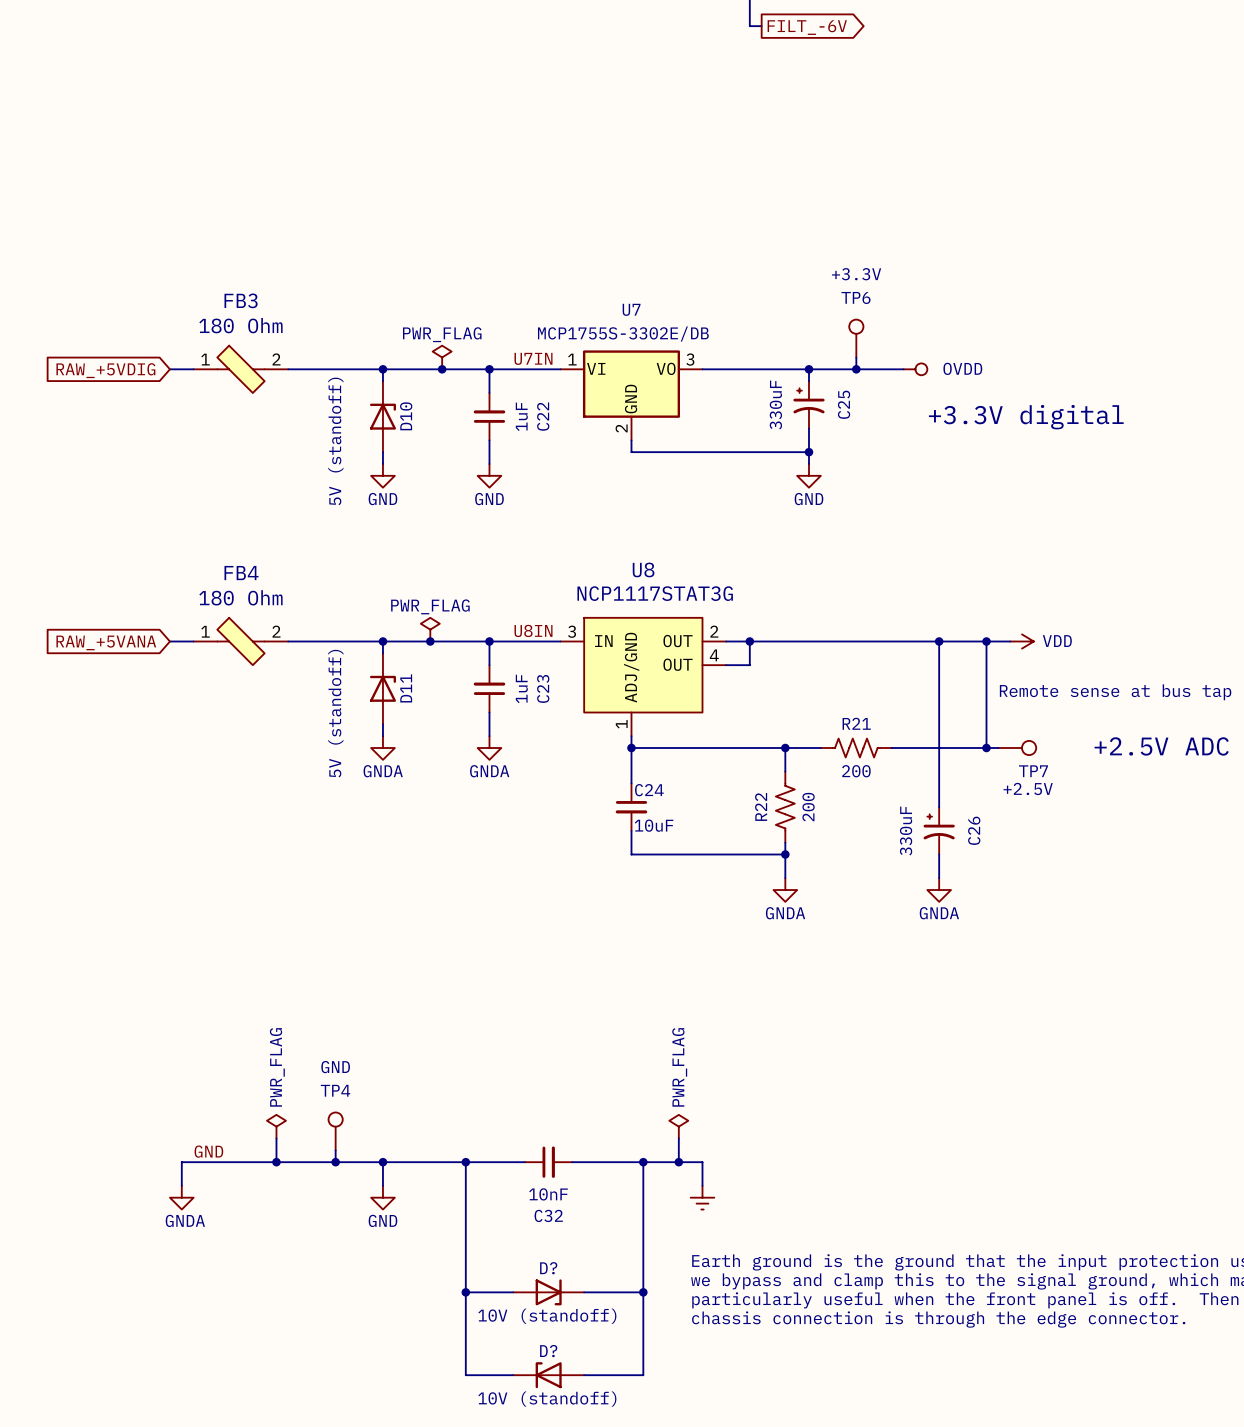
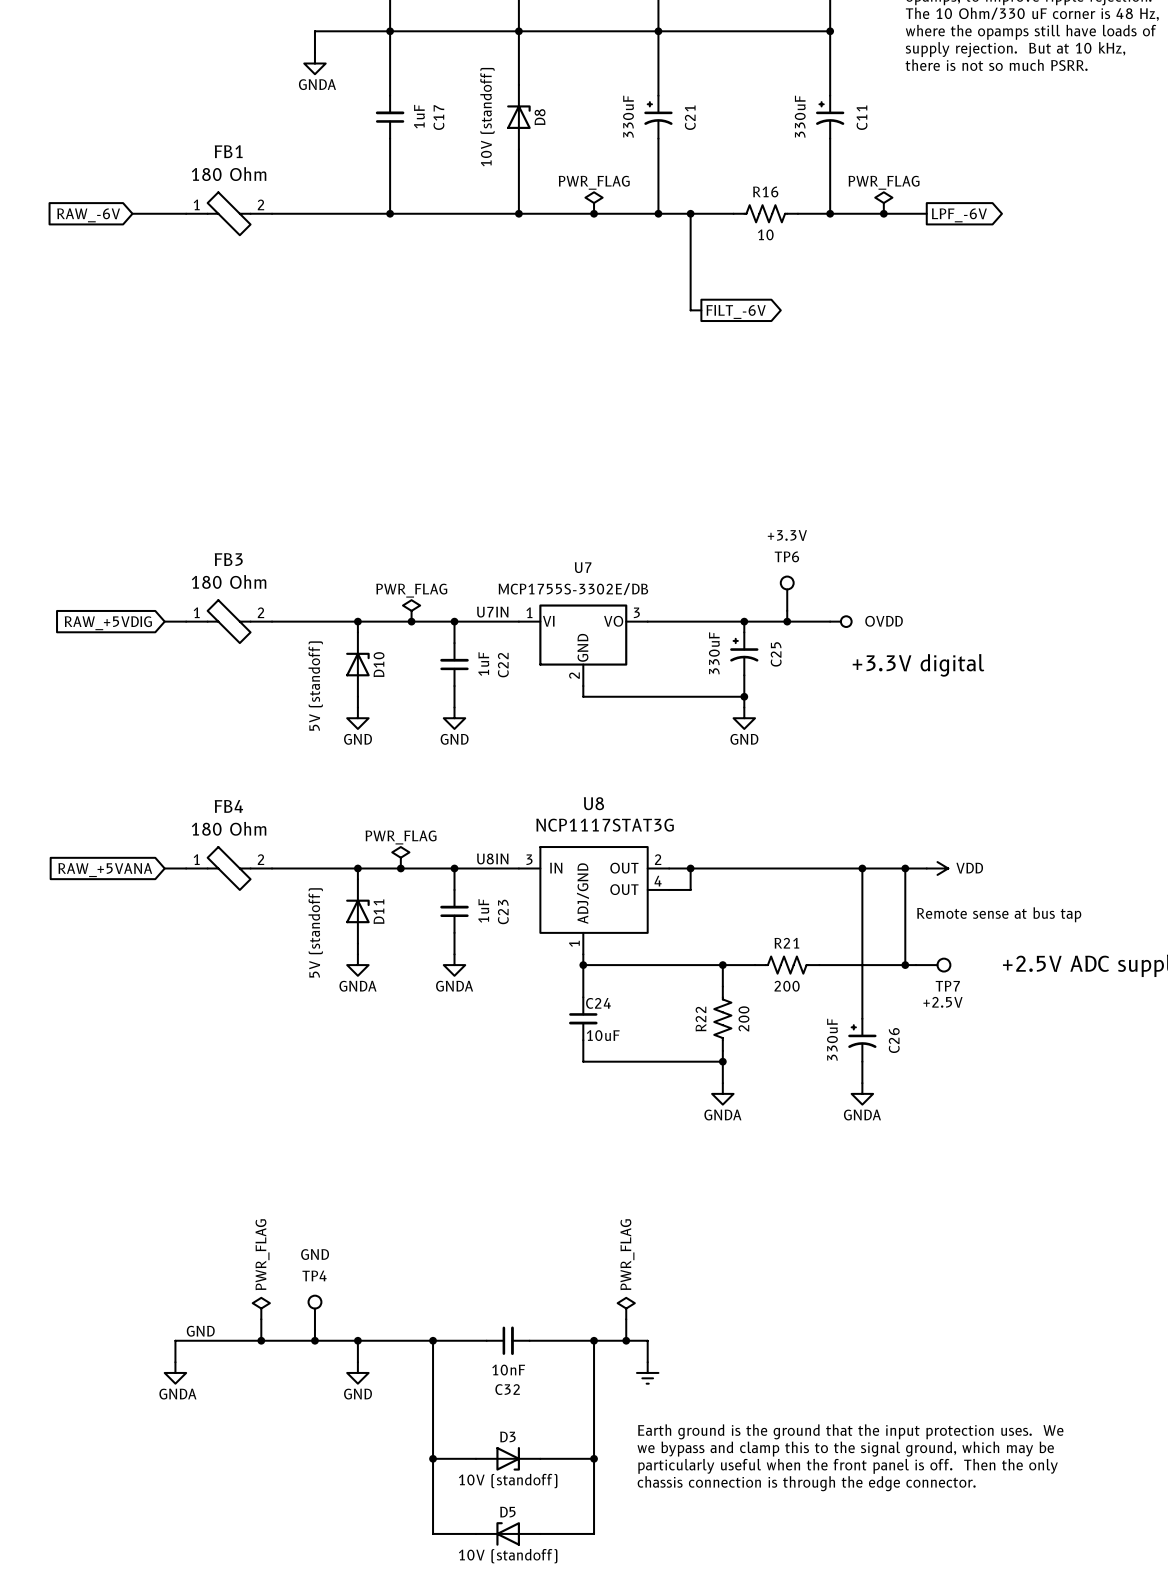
D? name: D? (548, 1268) -> D3 (507, 1436)
D? name: D? (548, 1351) -> D5 (507, 1512)

